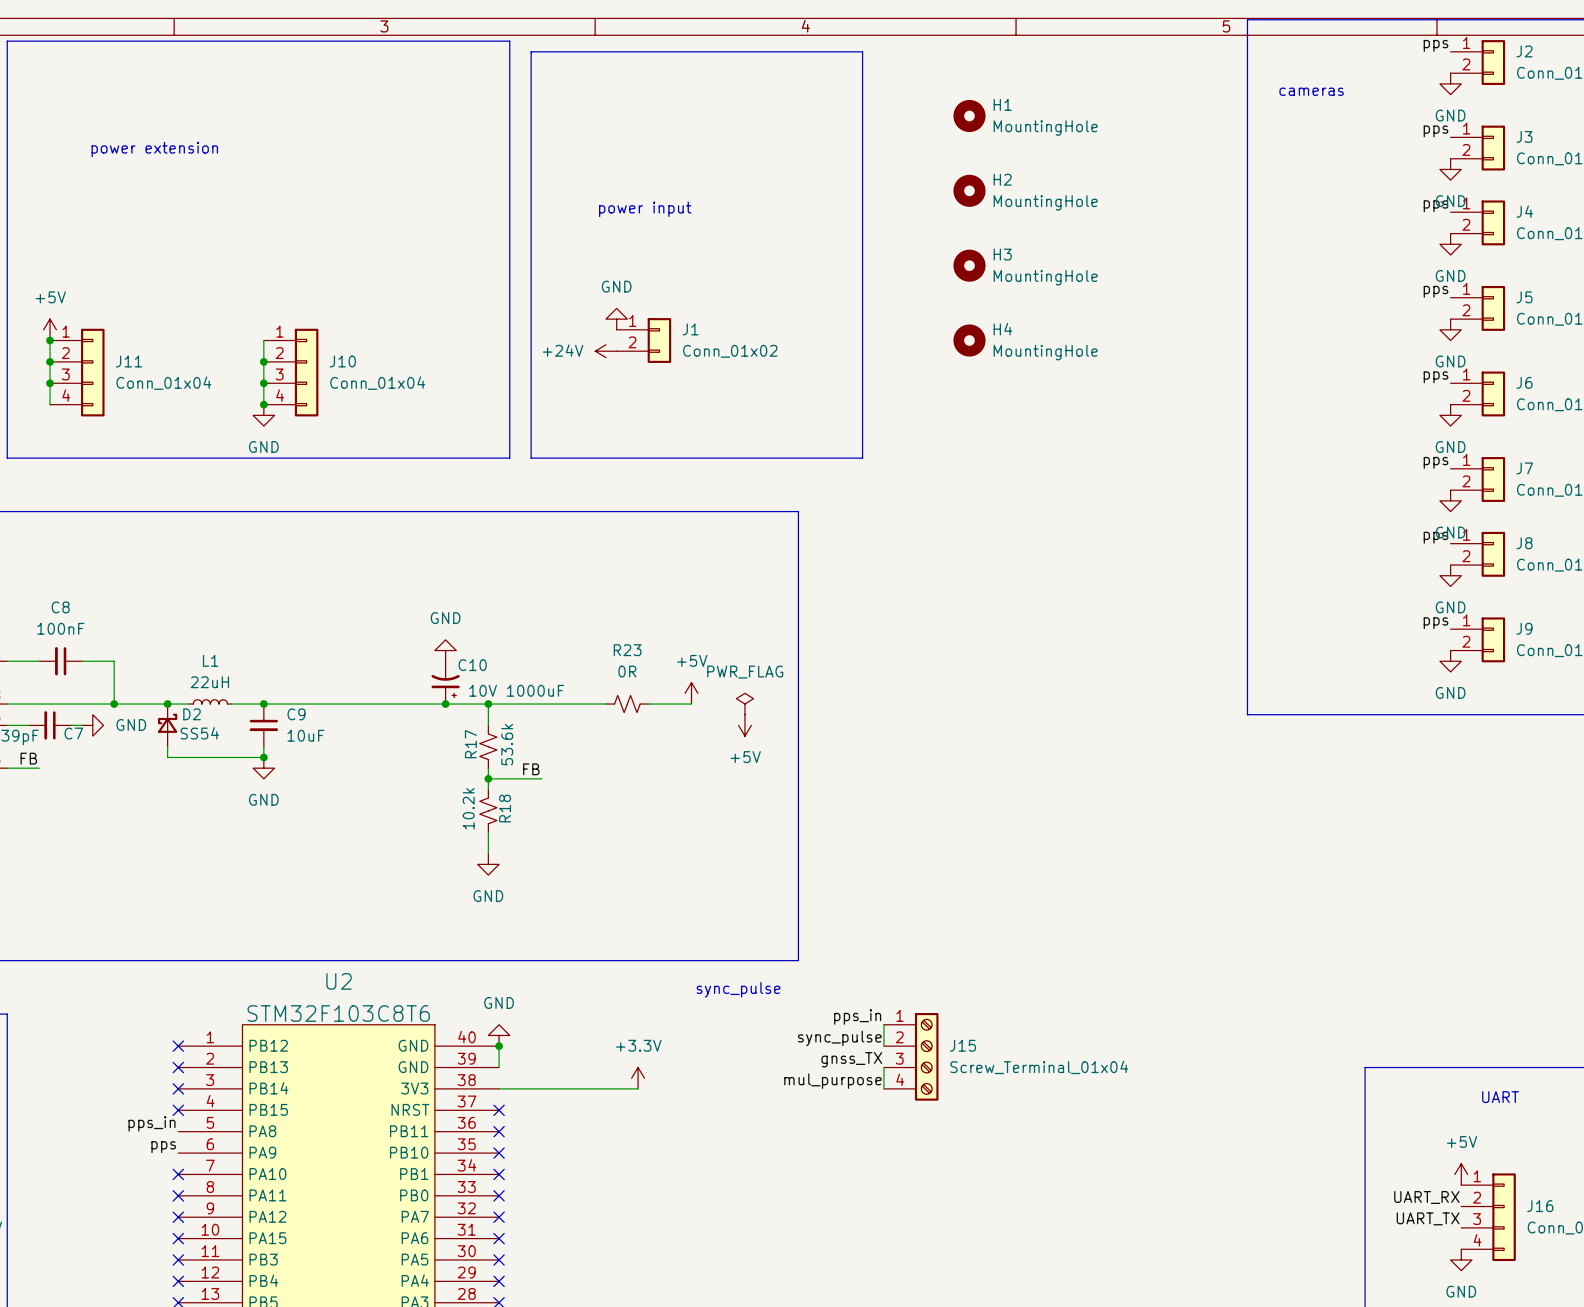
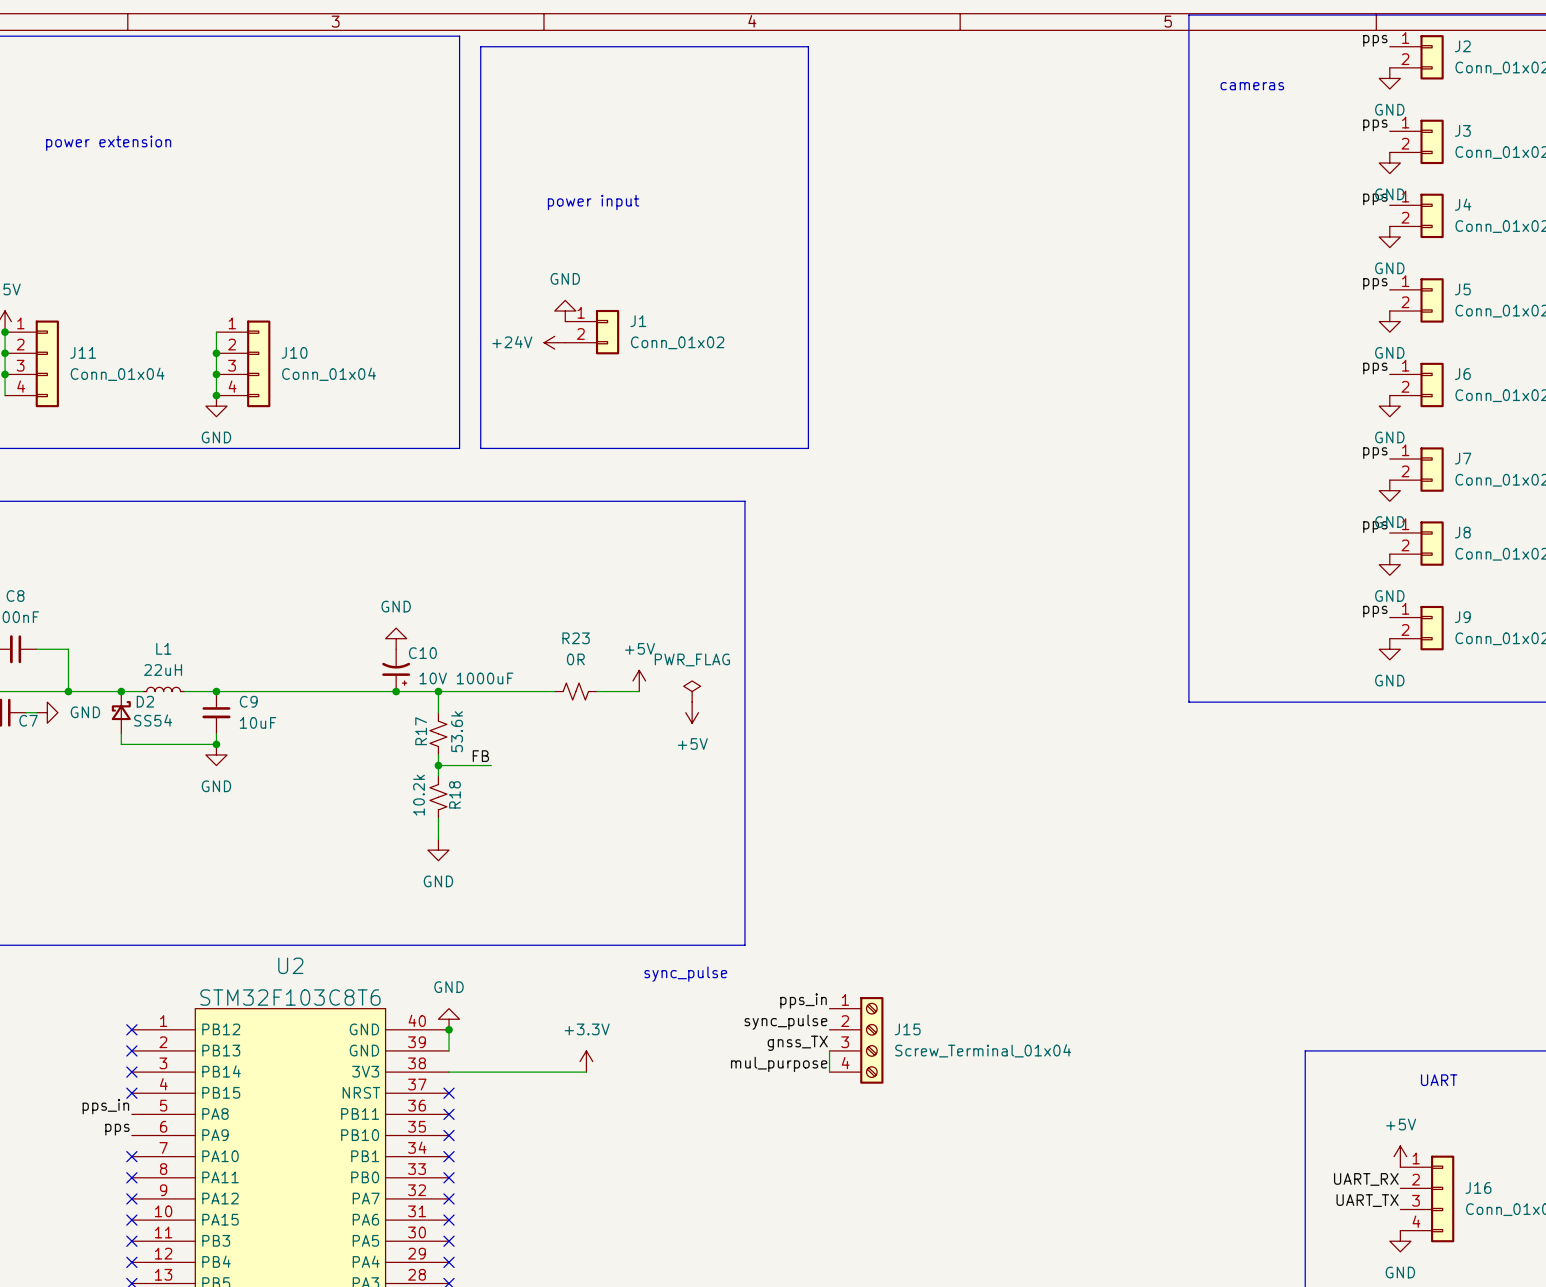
H1: MountingHole (969, 115) -> none
H2: MountingHole (969, 190) -> none
H3: MountingHole (969, 265) -> none
H4: MountingHole (969, 340) -> none
wire: (883, 1024) (883, 1046) -> none

